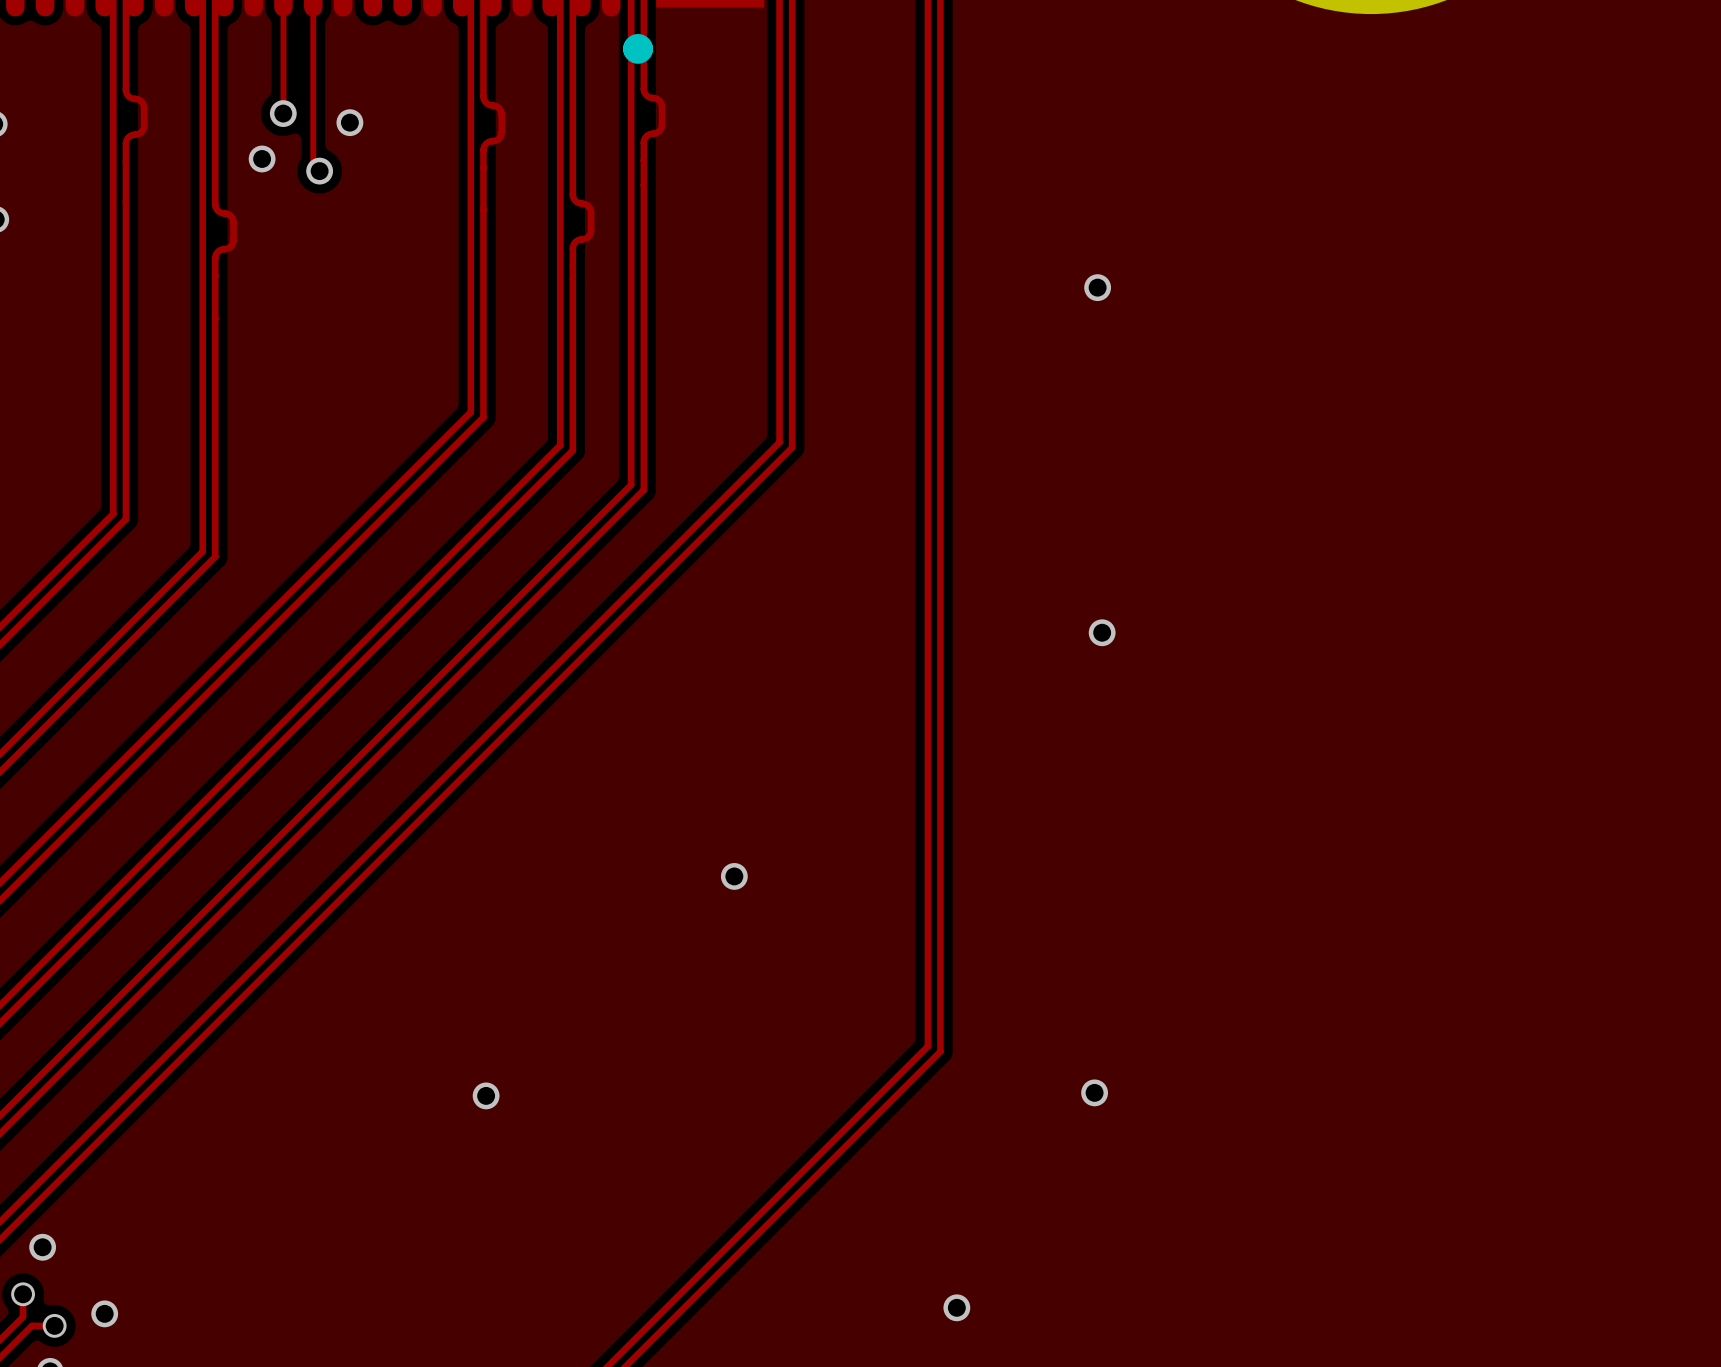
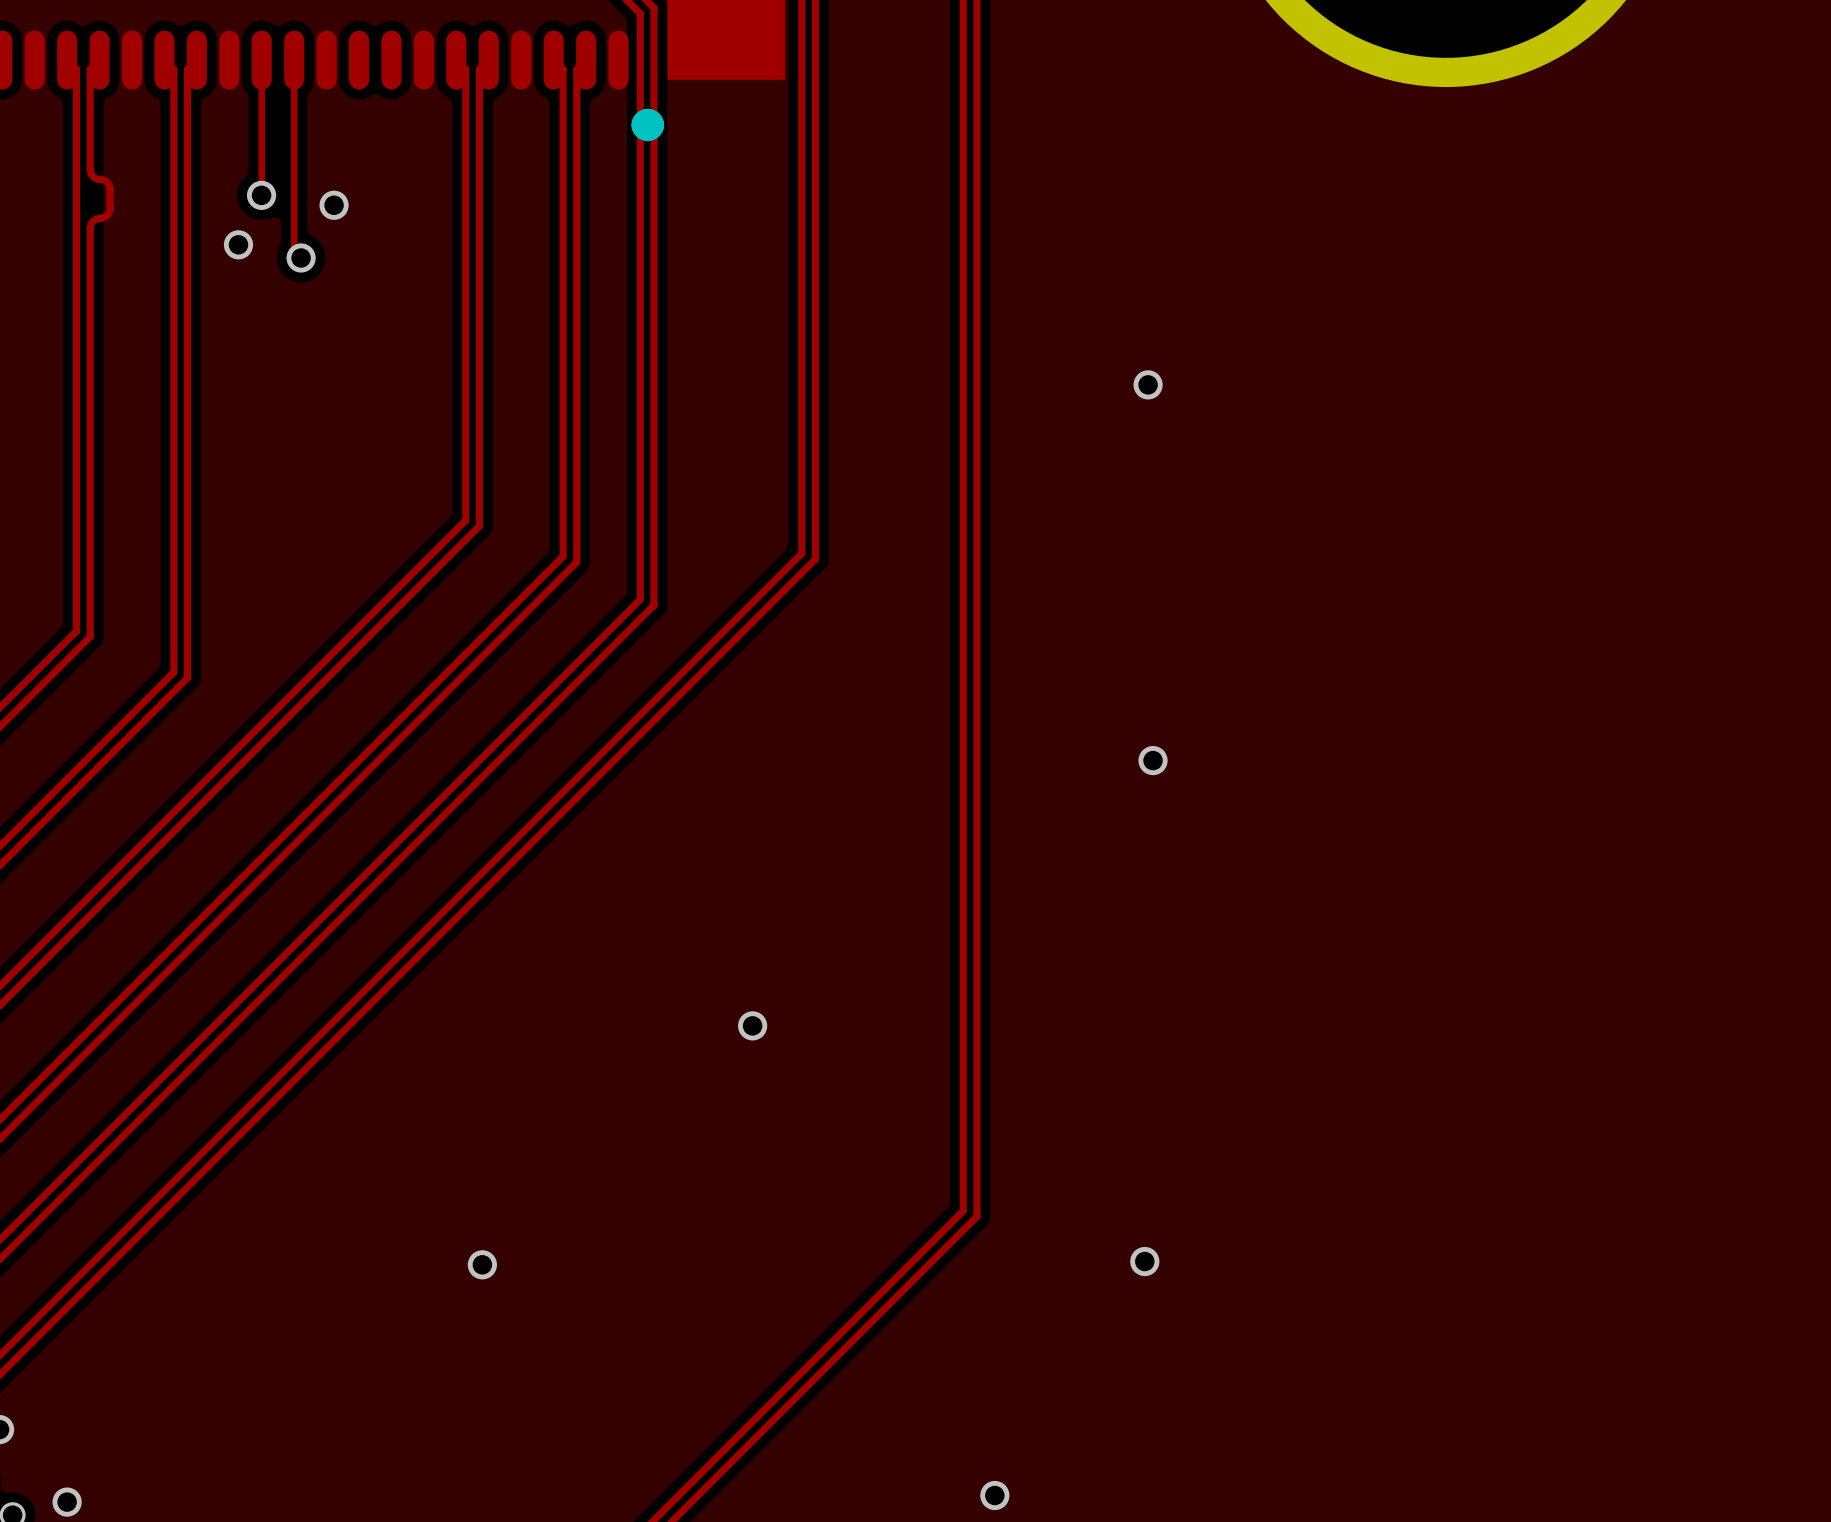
track: (643, 88) (646, 95) (658, 99) (662, 107) (661, 128) (656, 132) (647, 135) (643, 142) -> (654, 168) (654, 227)
track: (483, 96) (486, 103) (499, 108) (501, 114) (500, 136) (496, 140) (486, 143) (483, 150) -> (479, 176) (479, 235)
track: (572, 194) (575, 200) (587, 205) (591, 212) (590, 234) (585, 238) (576, 241) (572, 248) -> (576, 283) (576, 342)
track: (215, 204) (218, 211) (230, 216) (233, 222) (232, 243) (228, 248) (218, 251) (215, 258) -> (187, 294) (187, 352)

